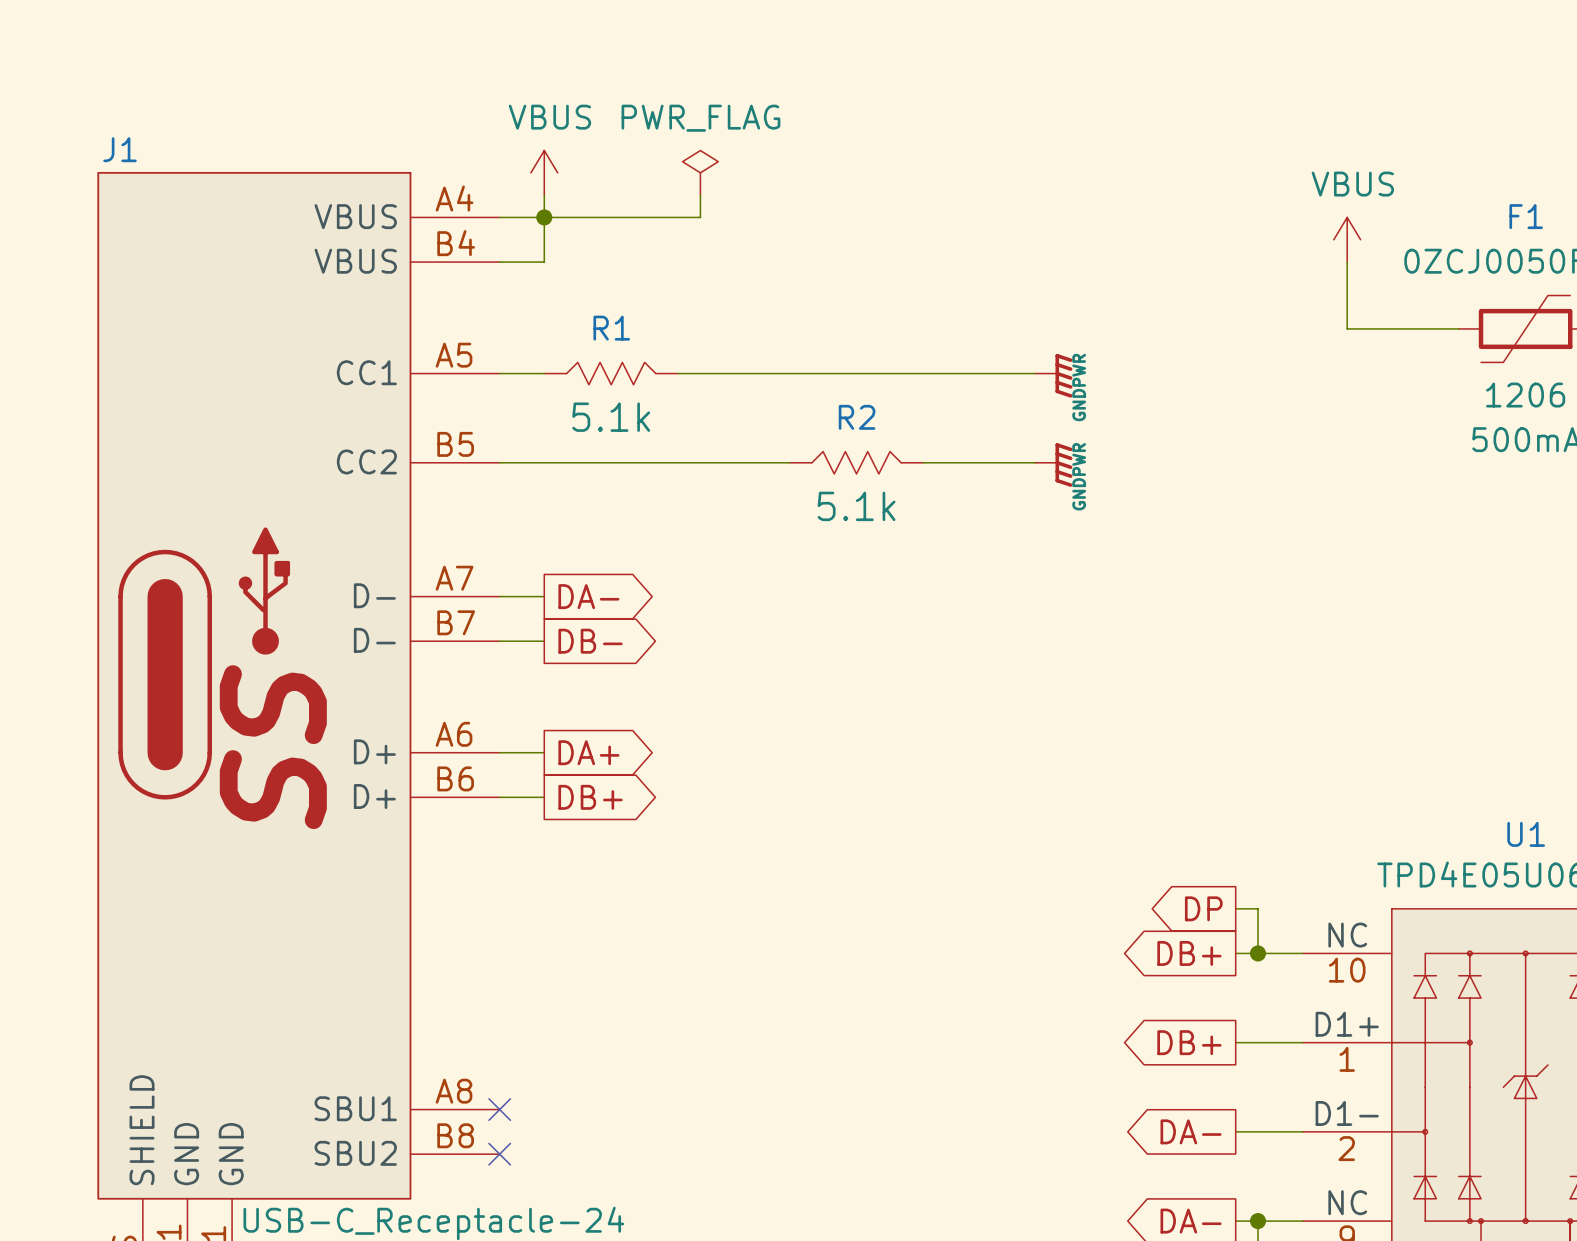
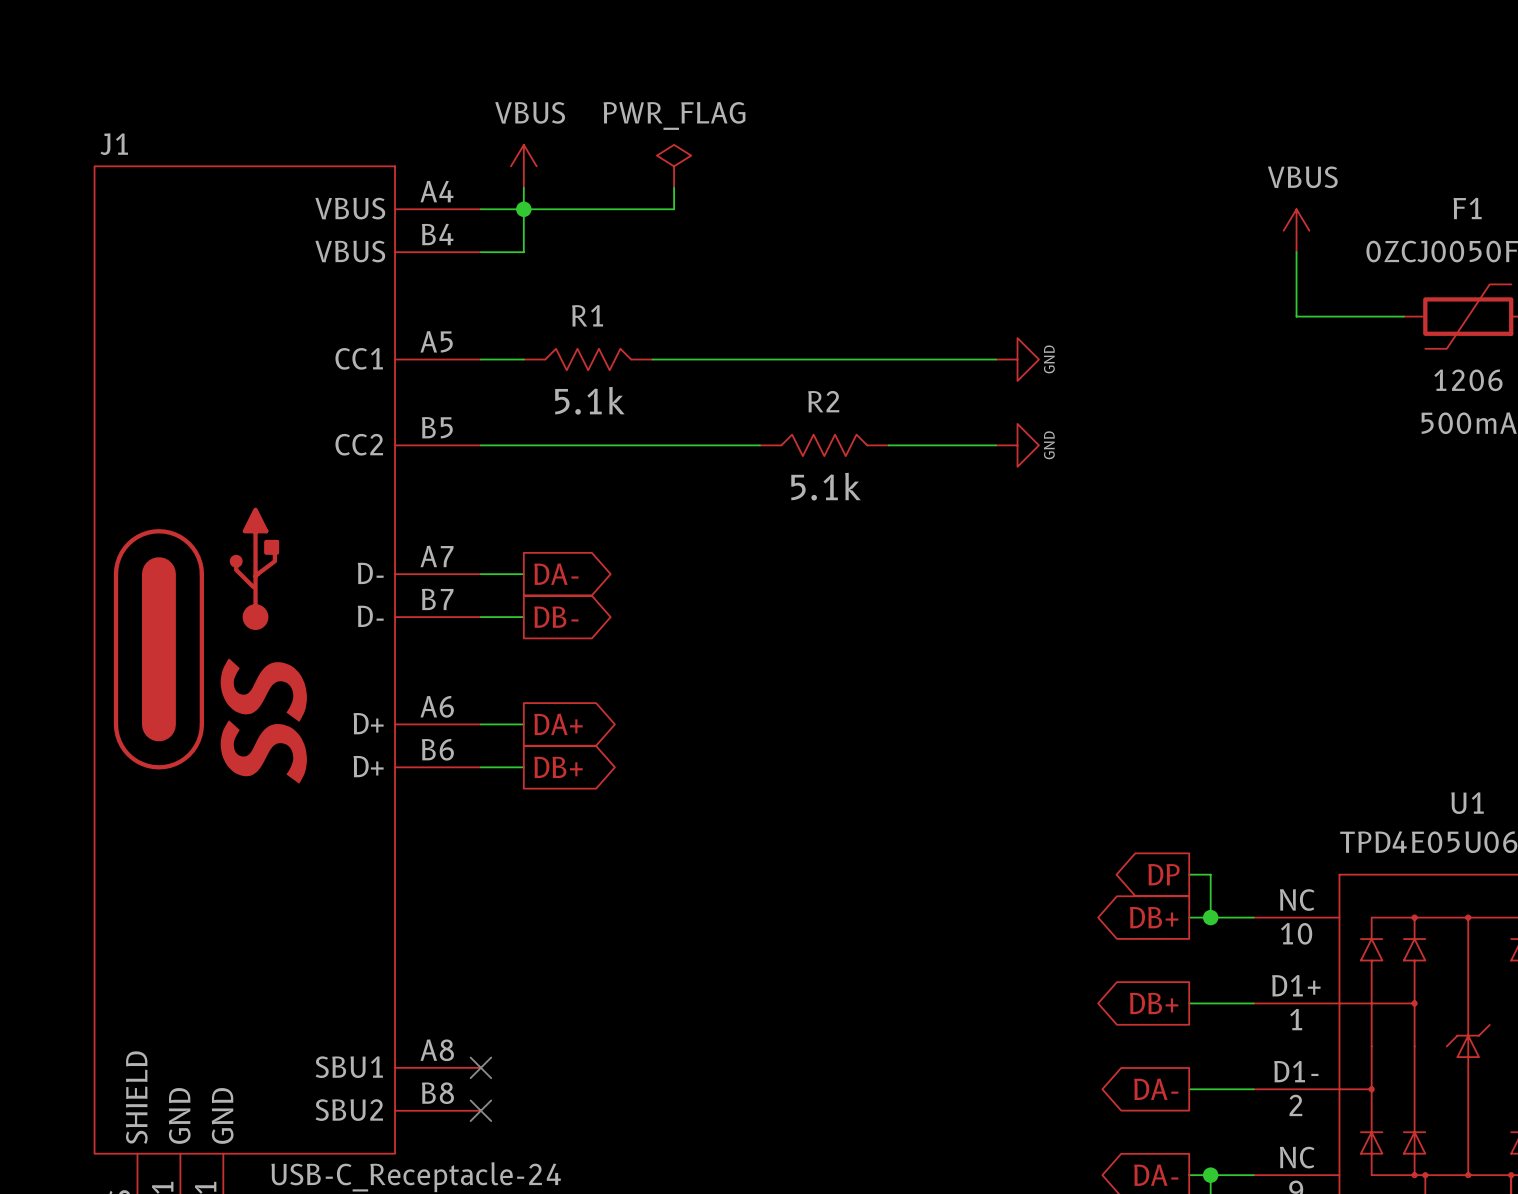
power symbol: GNDPWR (1053, 375) -> GND (1017, 359)
power symbol: GNDPWR (1053, 465) -> GND (1017, 445)

